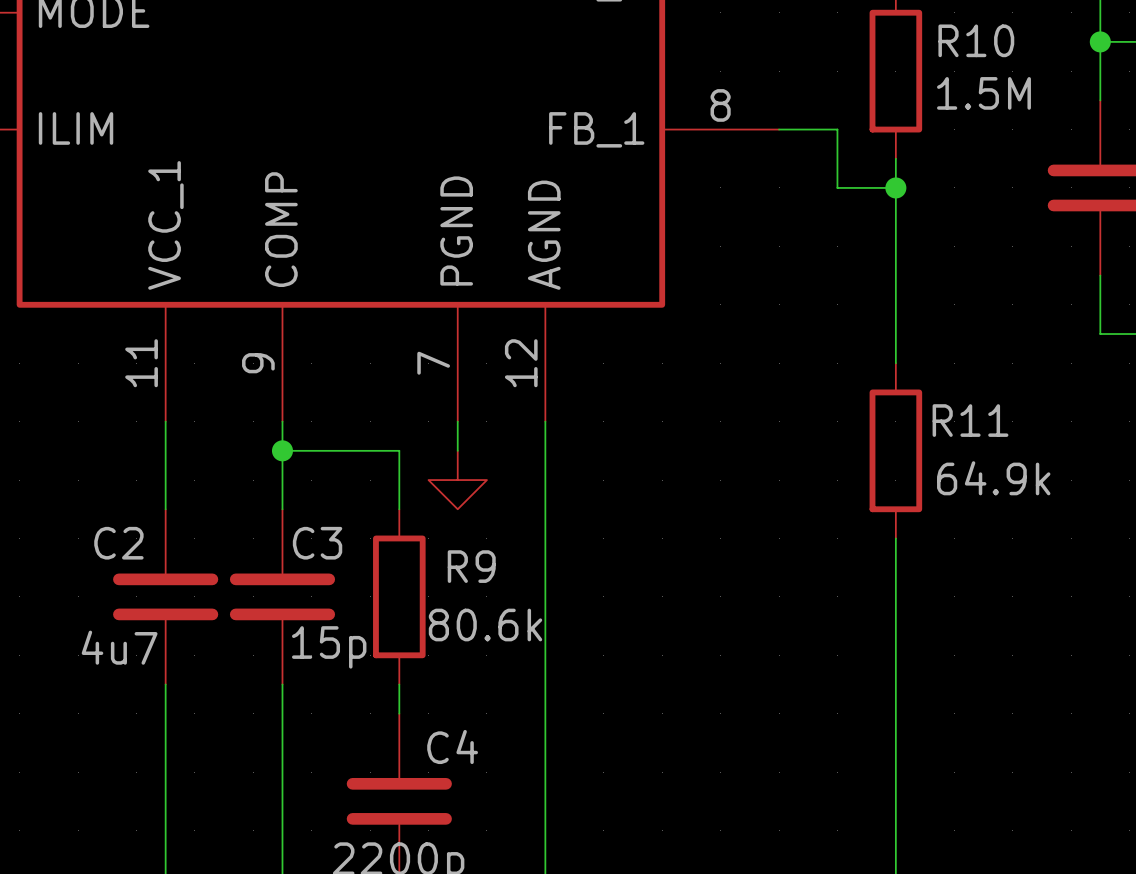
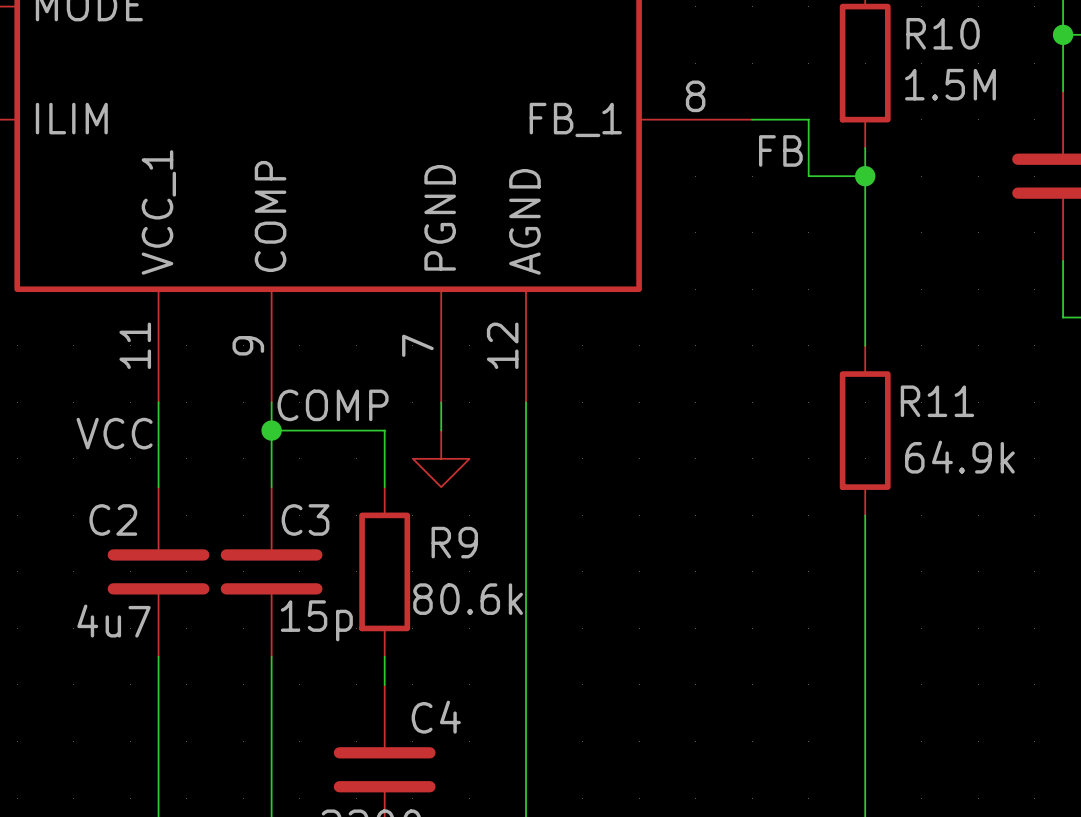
label: none -> FB (780, 150)
label: none -> COMP (333, 405)
label: none -> VCC (114, 433)

